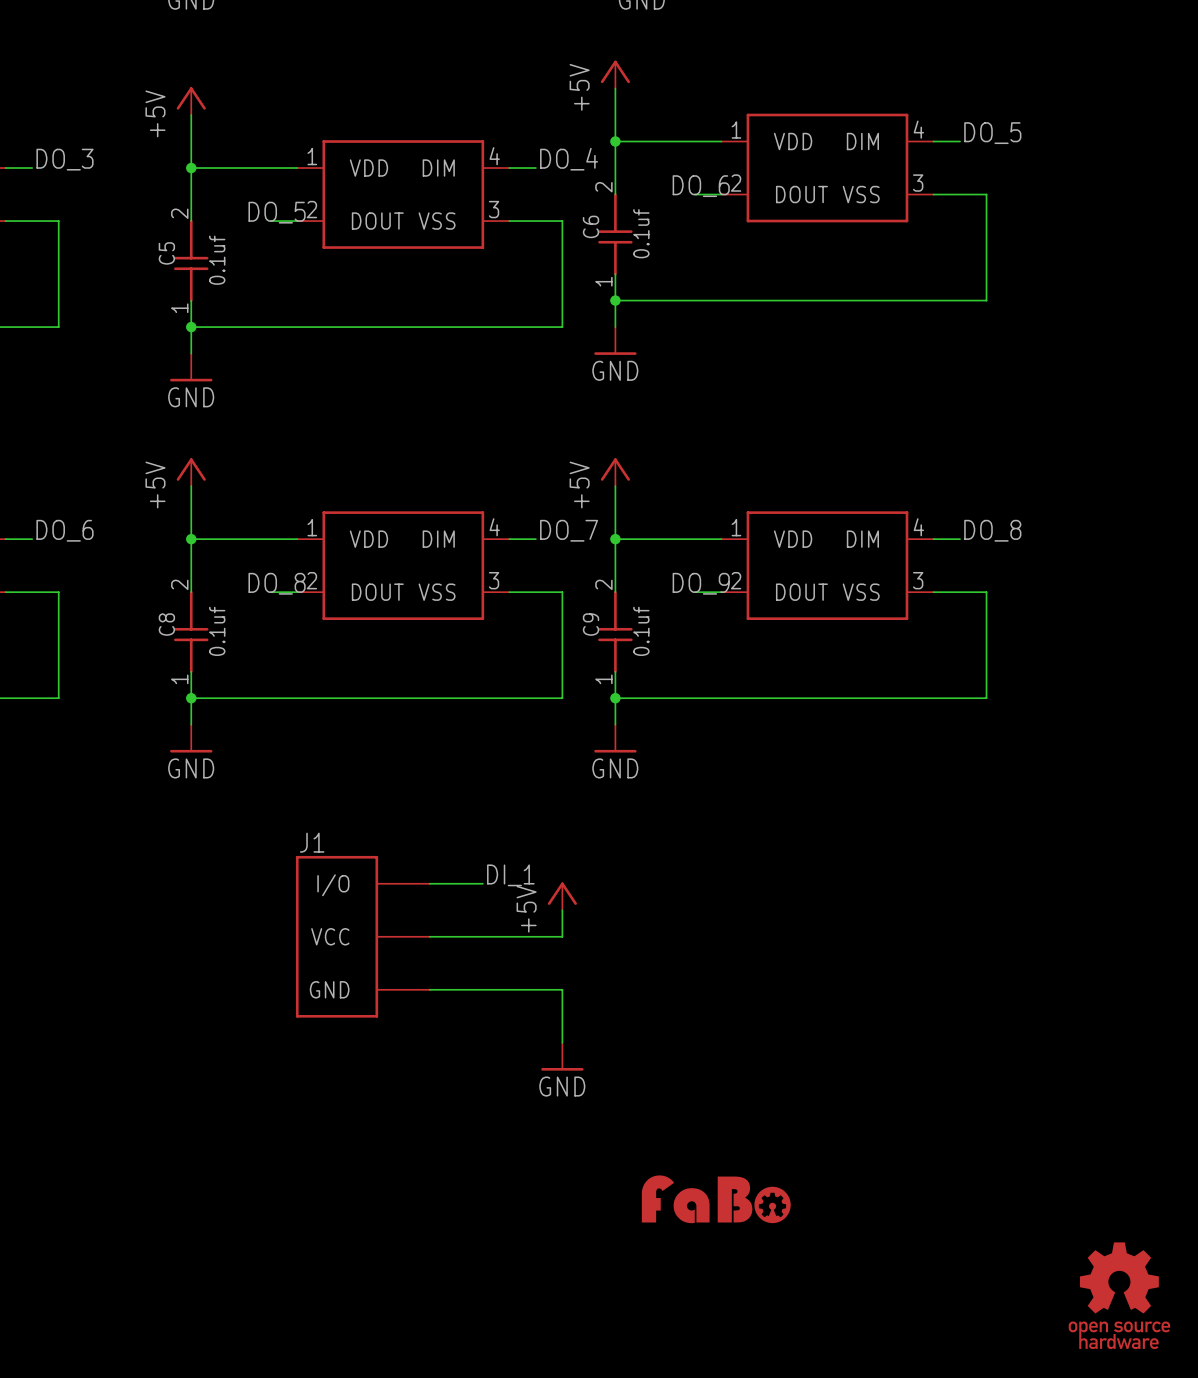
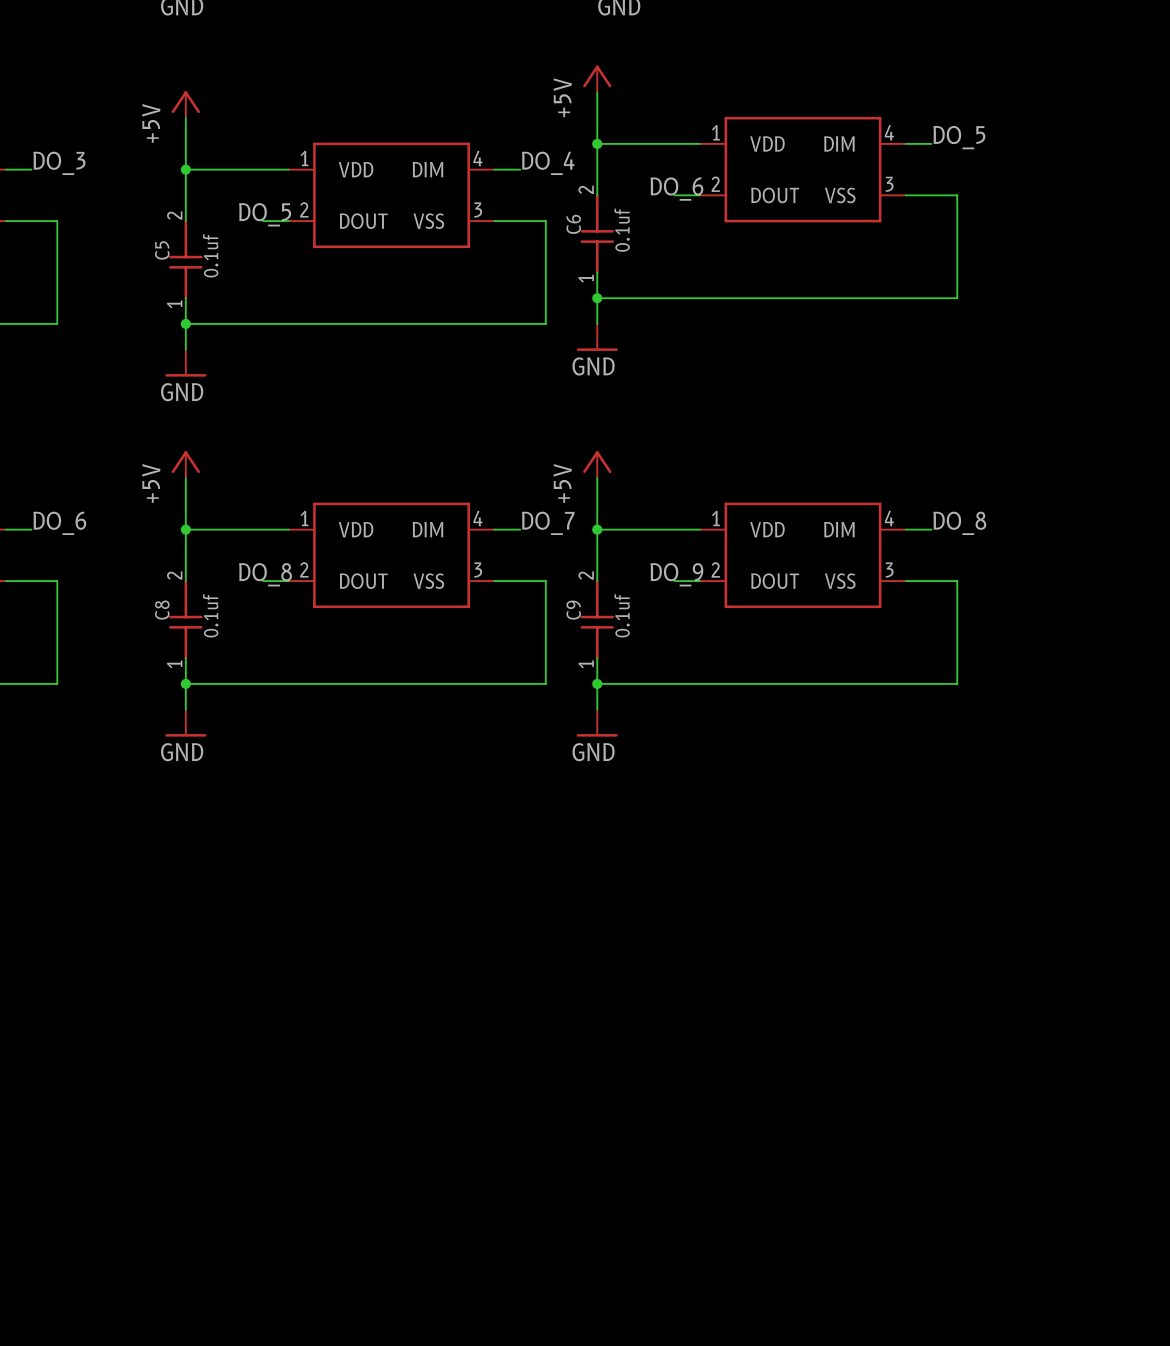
label: DI_1 (510, 875) -> none
wire: (429, 883) (482, 883) -> none
power symbol: +5V (562, 896) -> none
wire: (562, 910) (562, 936) (429, 936) -> none
J1: (362, 936) -> none
wire: (429, 989) (562, 989) (562, 1042) -> none
power symbol: GND (562, 1056) -> none
part: (716, 1199) -> none
part: (1119, 1295) -> none

